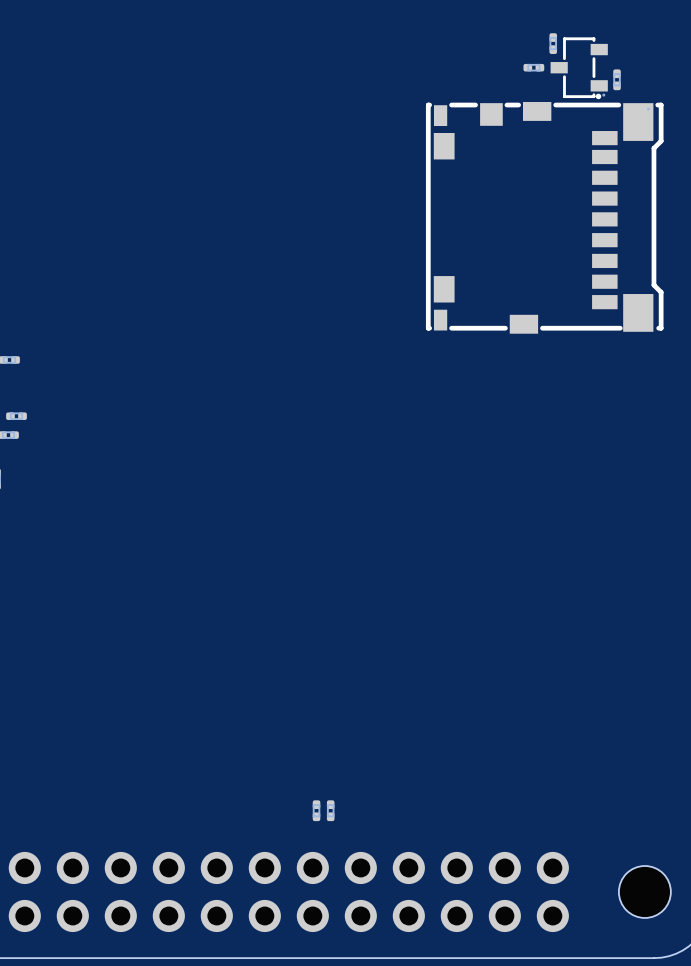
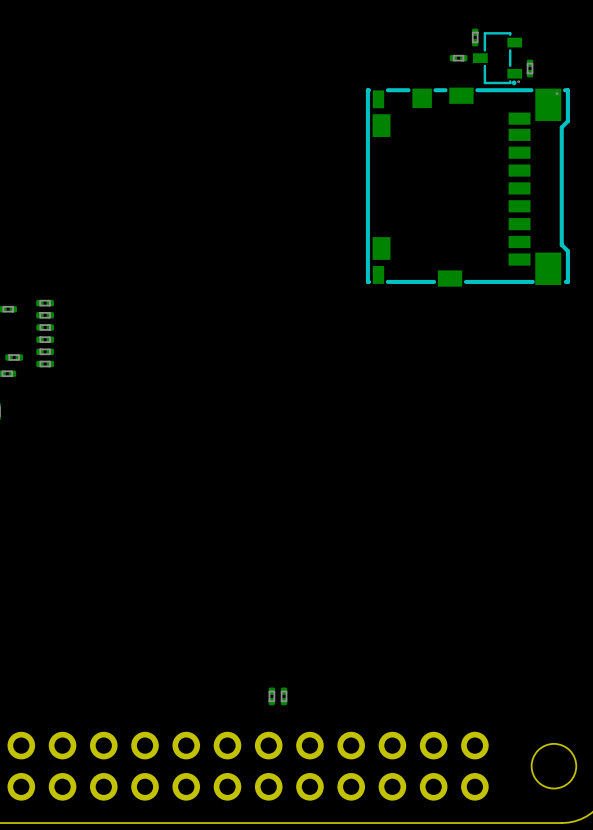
part: none -> (45, 303)
part: none -> (45, 315)
part: none -> (45, 327)
part: none -> (45, 339)
part: none -> (45, 351)
part: none -> (45, 364)

